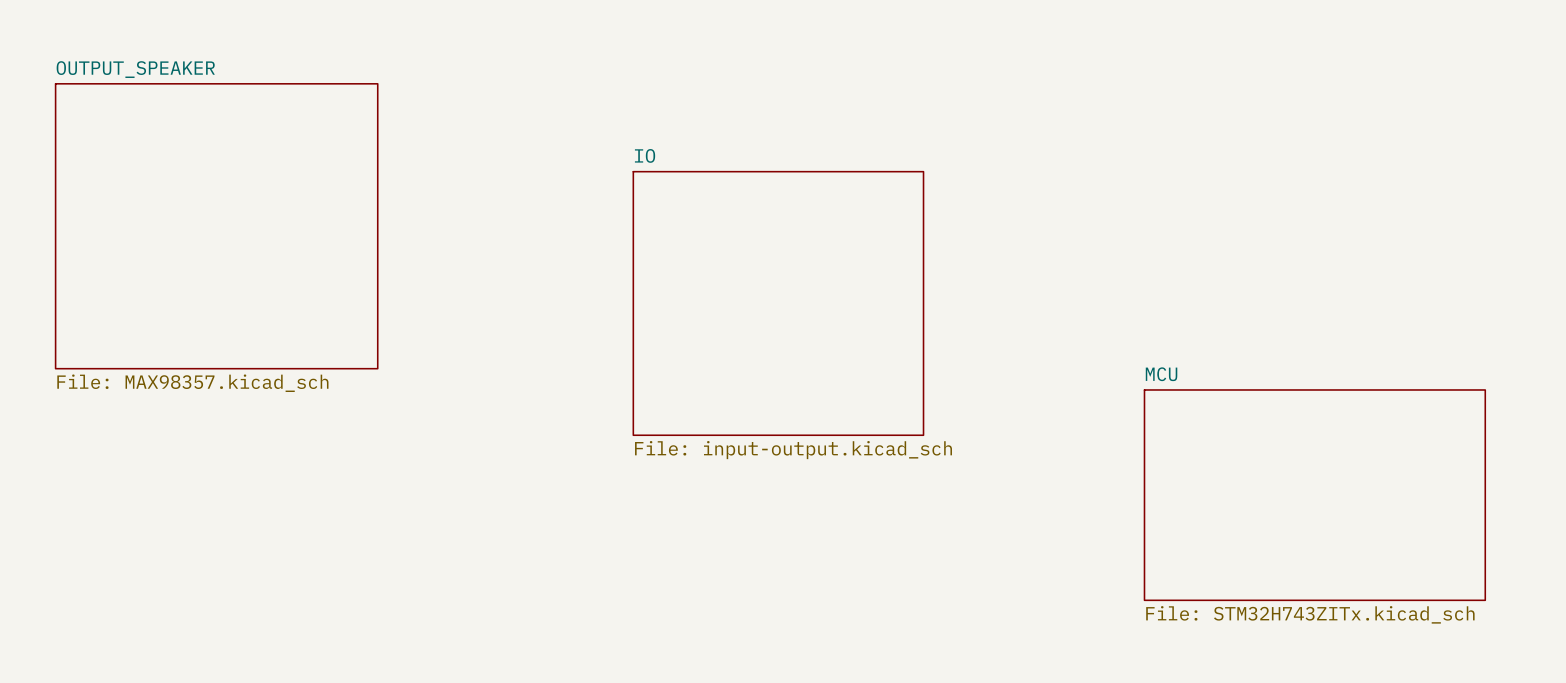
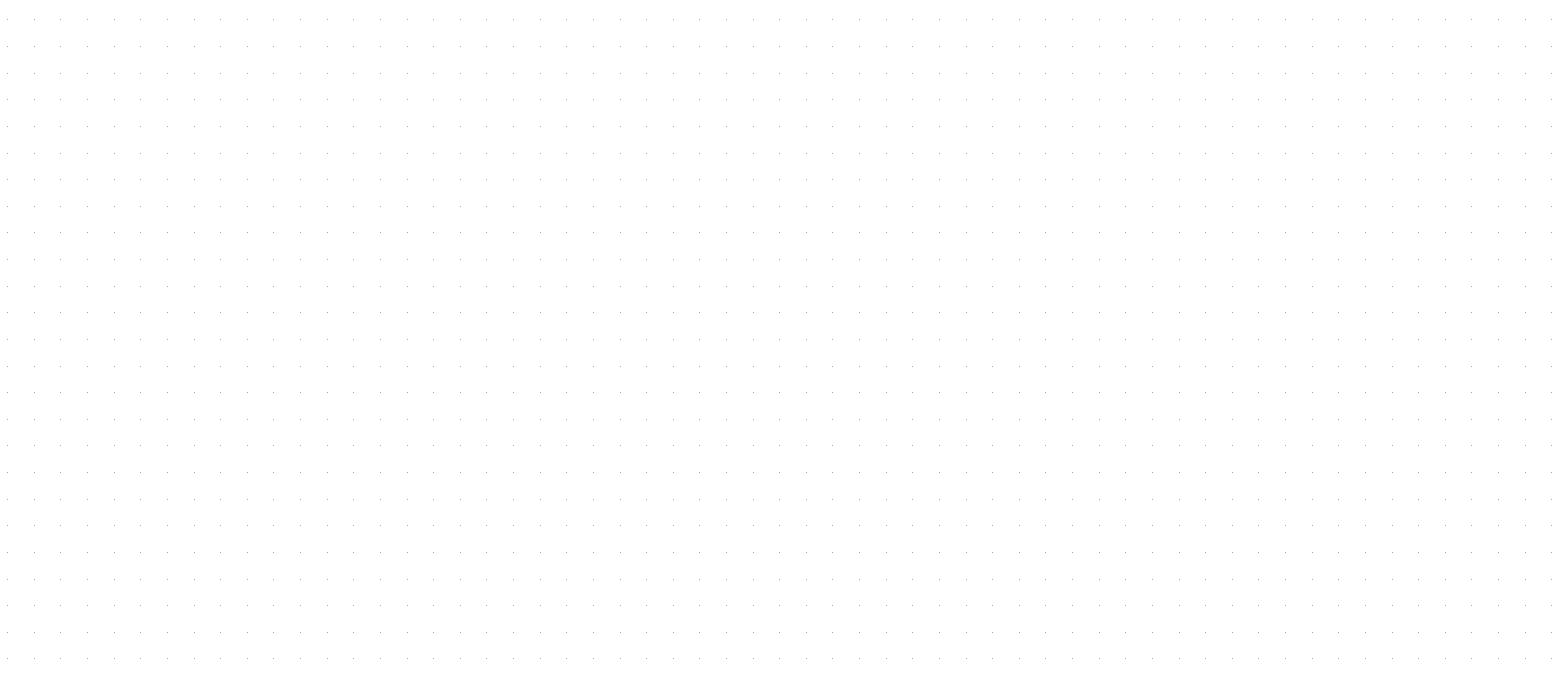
sheet OUTPUT_SPEAKER: File: MAX98357.kicad_sch (216, 226) -> none
sheet IO: File: input-output.kicad_sch (778, 303) -> none
sheet MCU: File: STM32H743ZITx.kicad_sch (1314, 495) -> none

